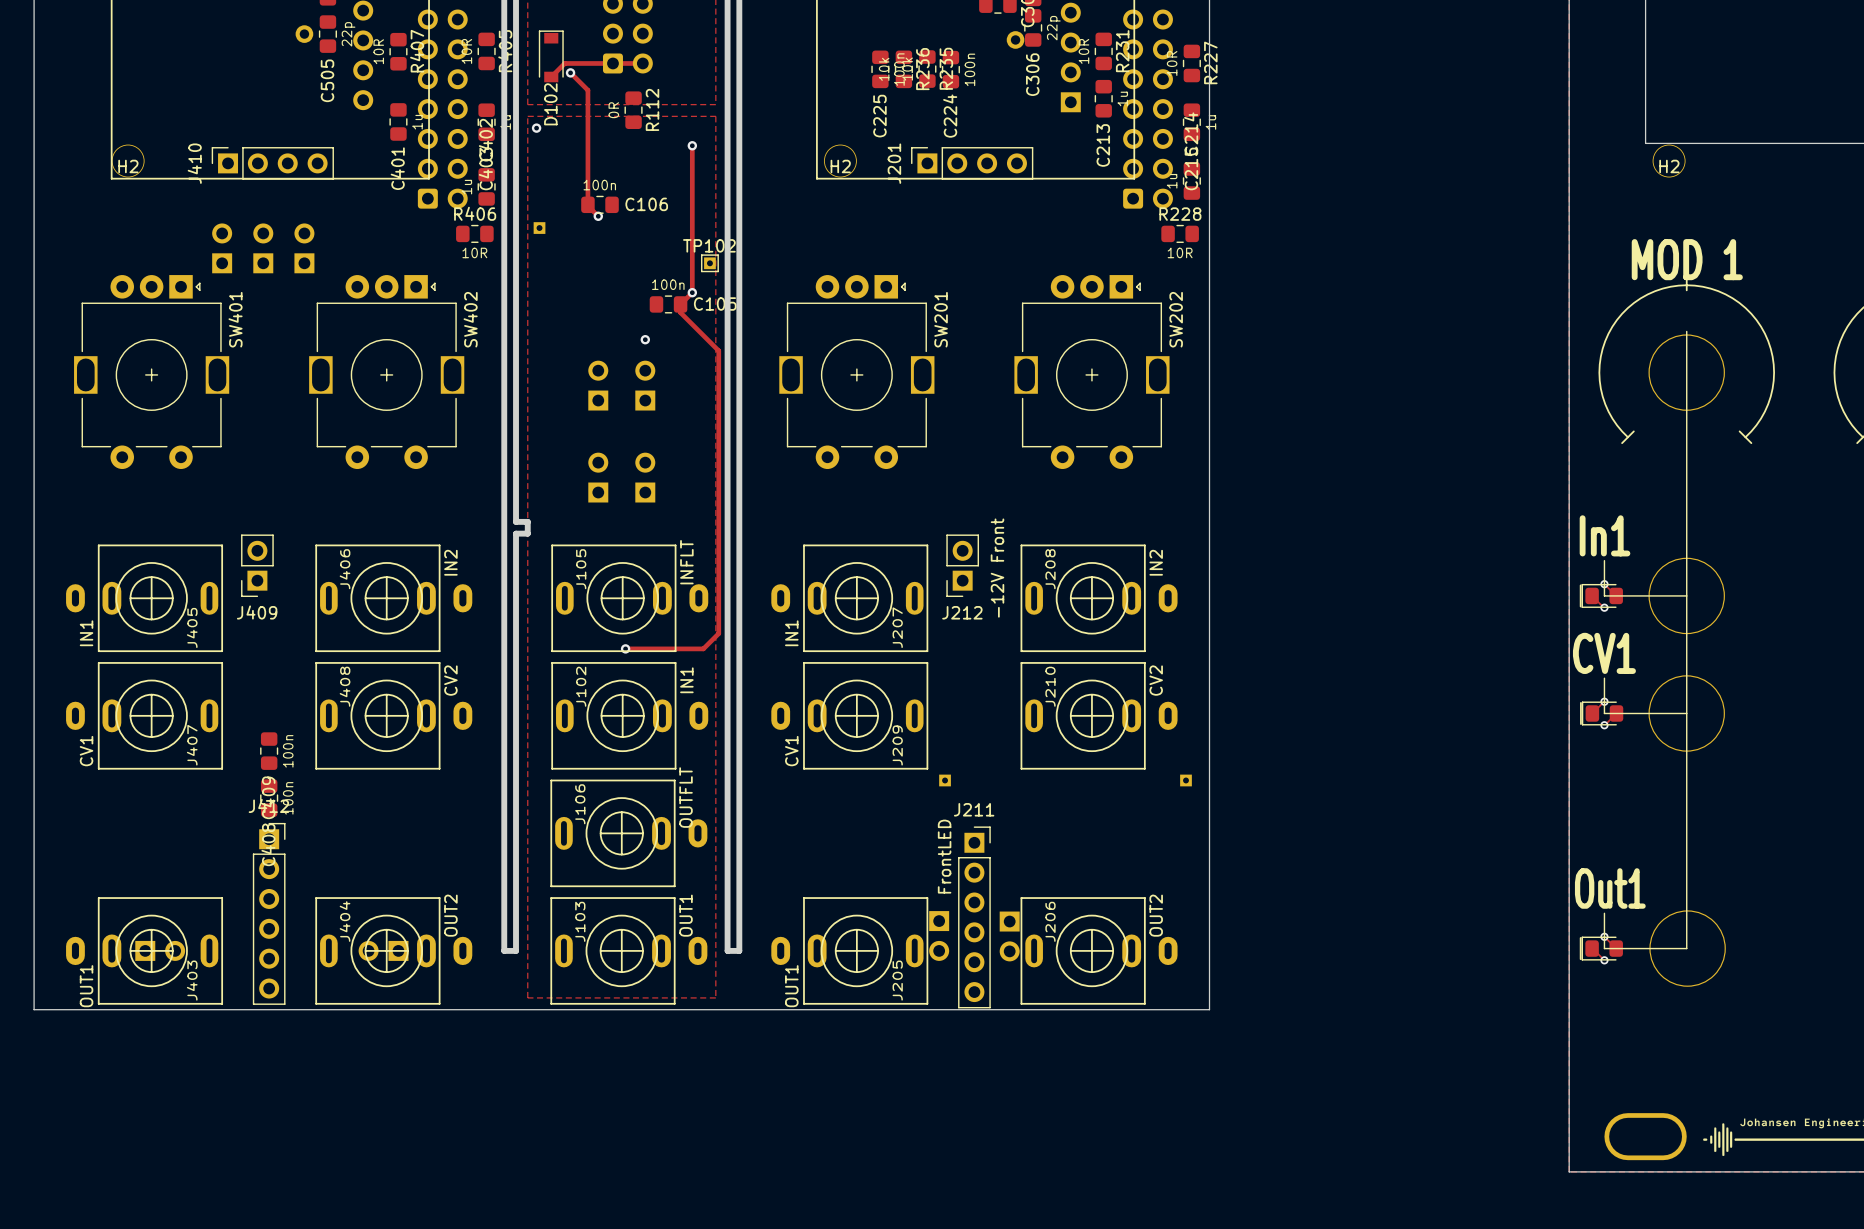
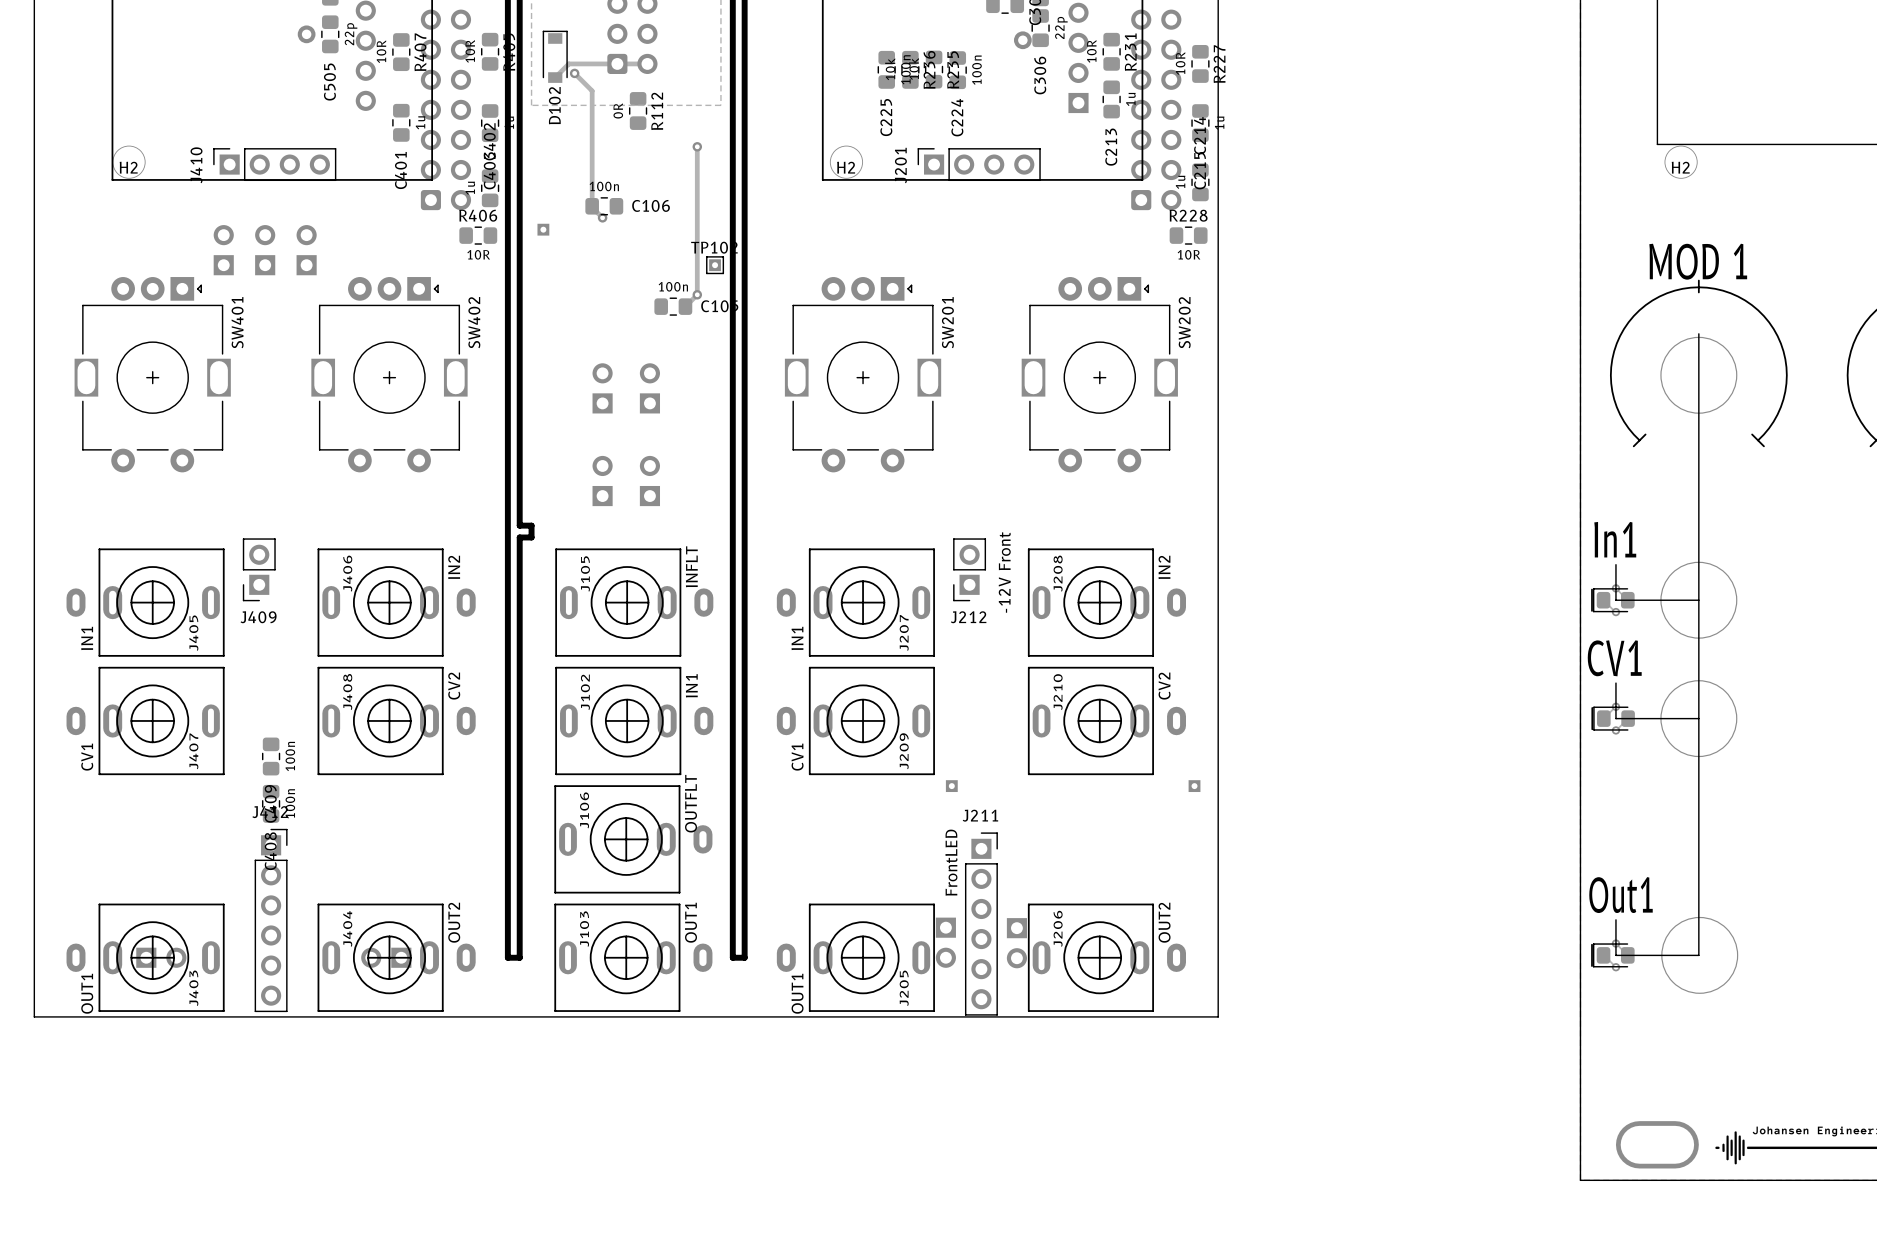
zone outline: (527, 116) (527, 997) (715, 997) (715, 116) (527, 116) -> none
via: (536, 128) -> none
track: (680, 304) (680, 312) (718, 350) (718, 633) (703, 648) (625, 648) -> none
via: (645, 339) -> none
via: (625, 648) -> none

